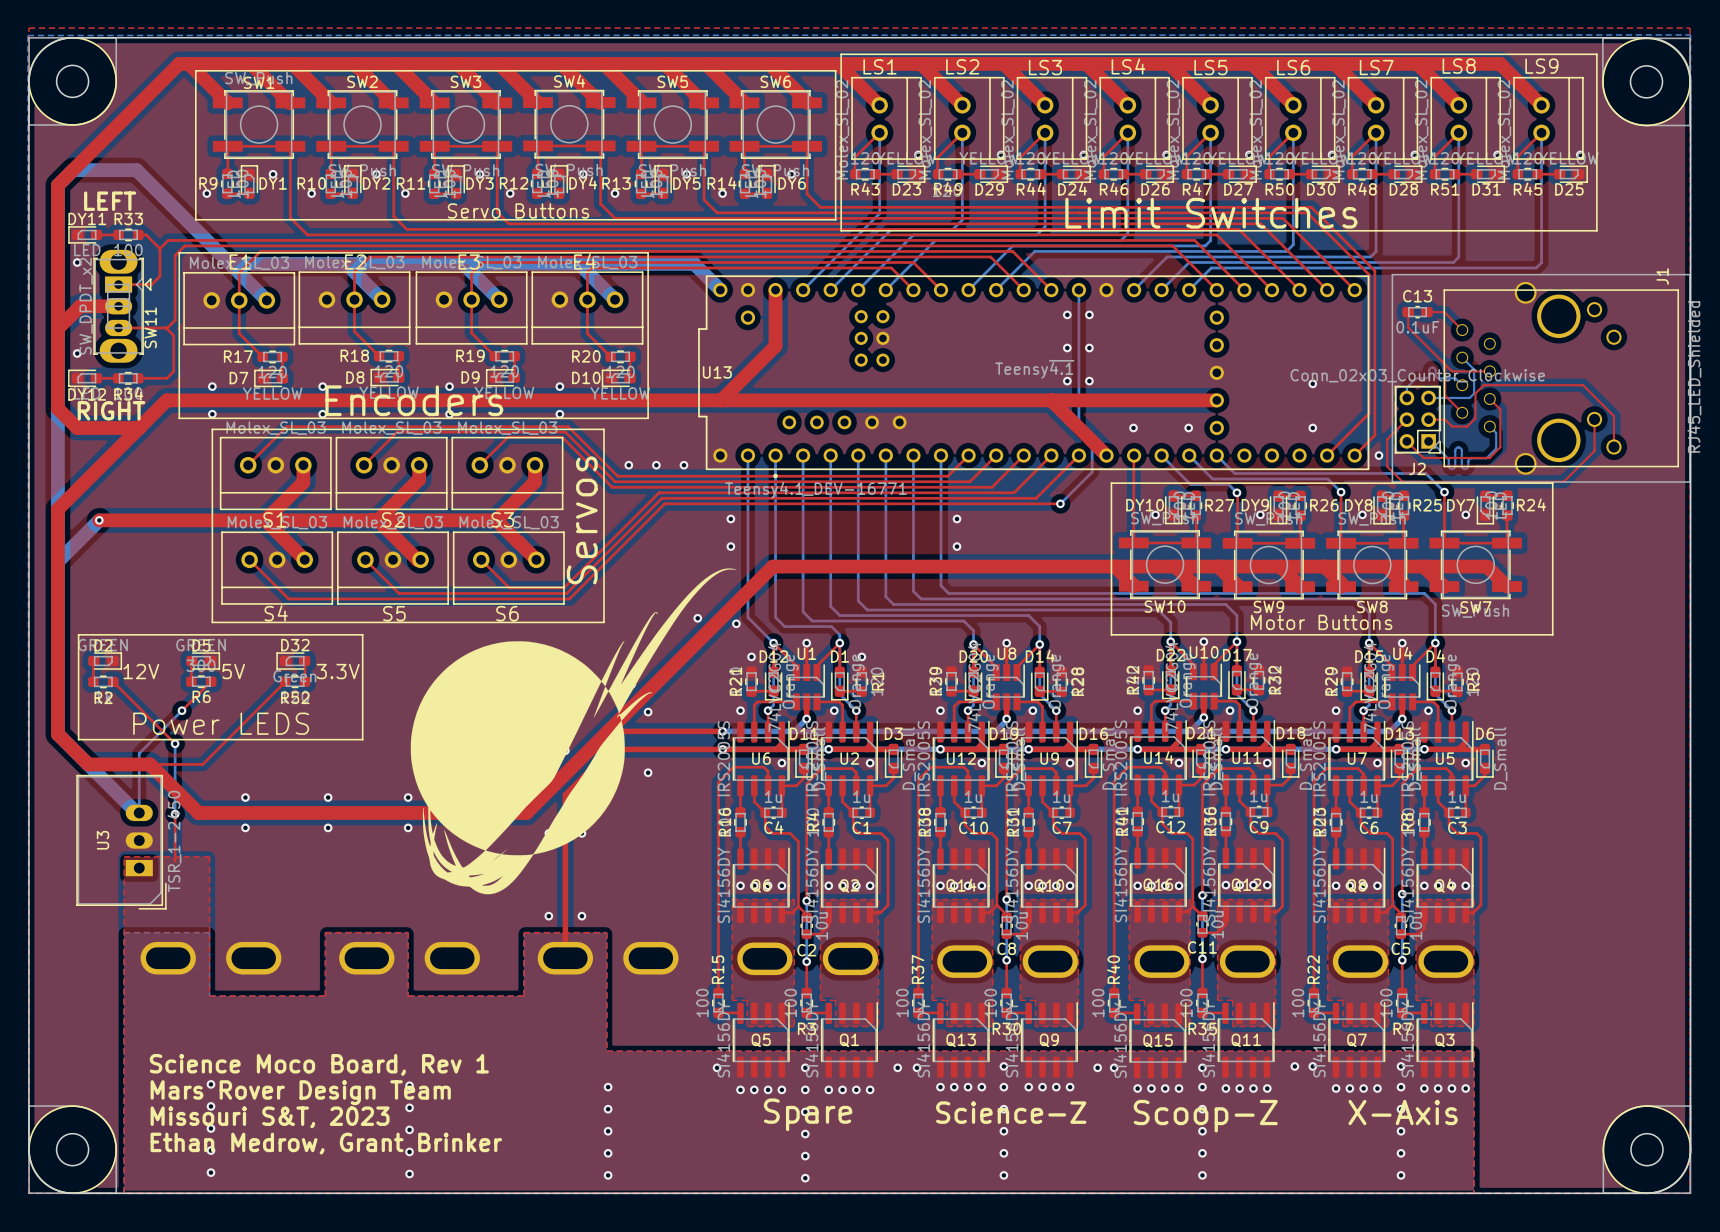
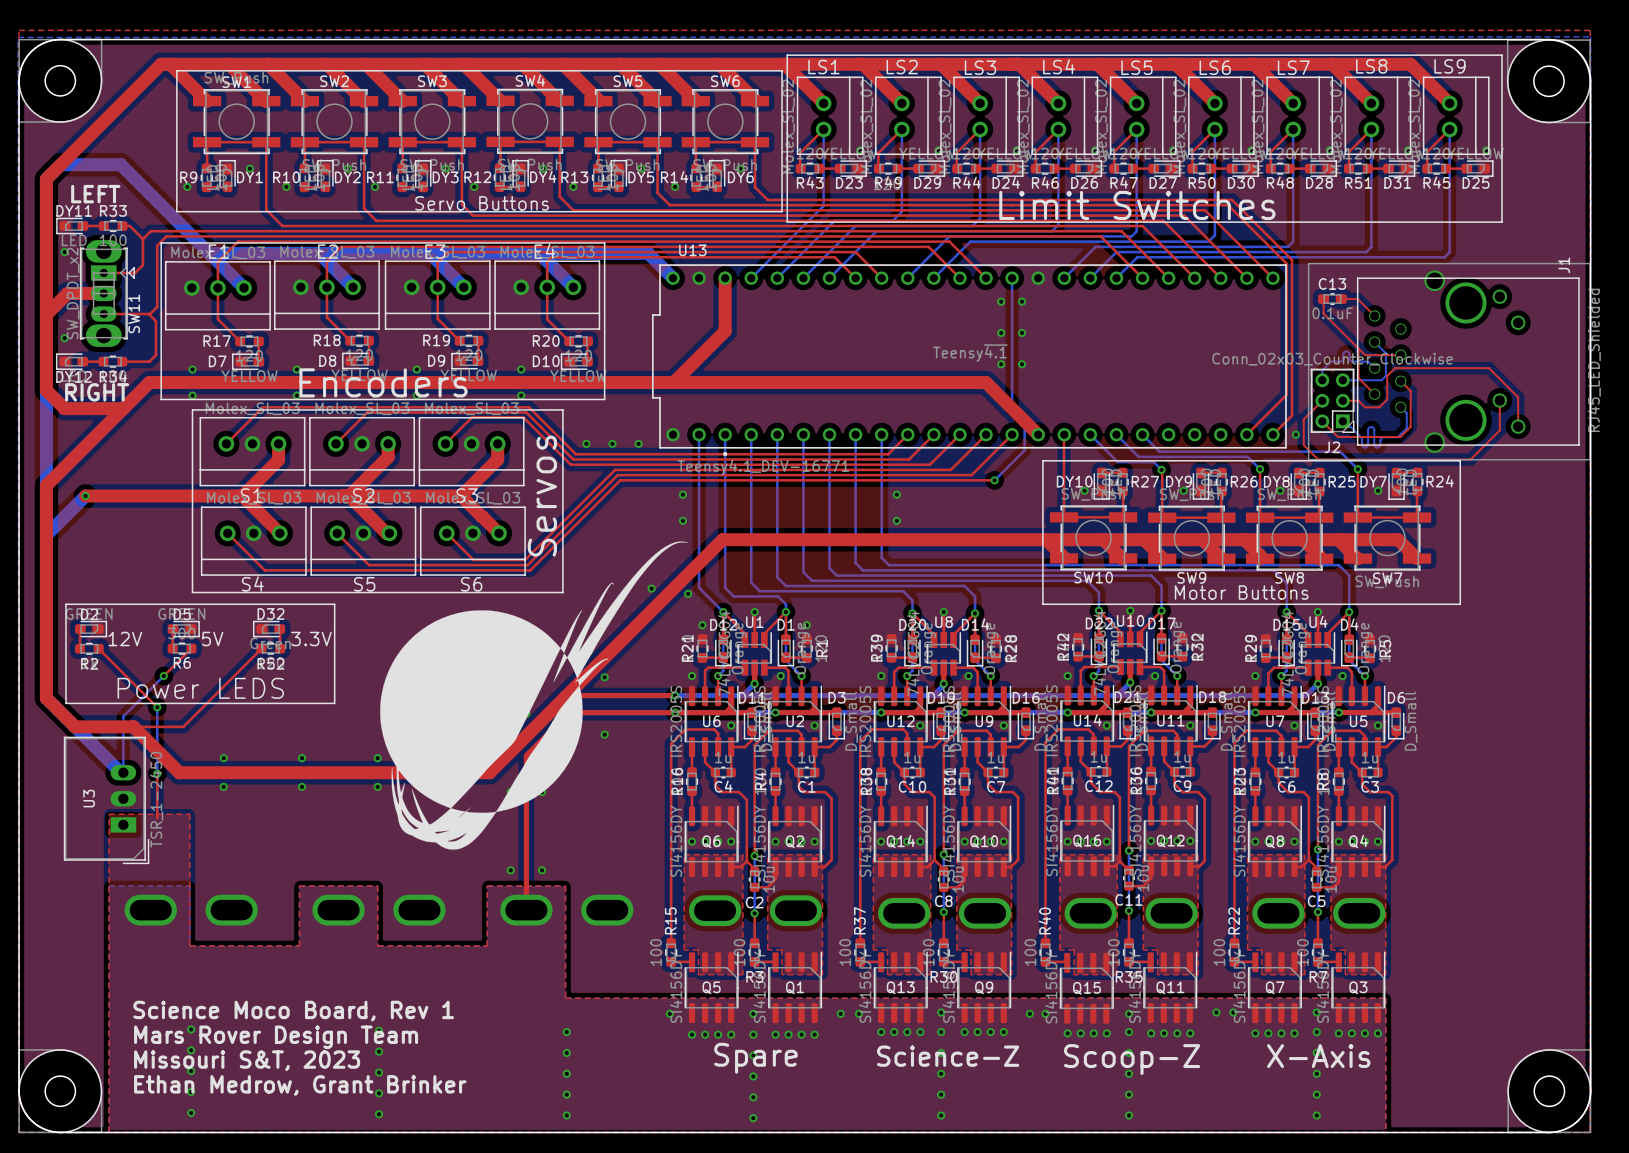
U13 footprint: [698, 275, 1370, 479] -> [652, 264, 1287, 457]
U13 name position: U13 (717, 372) -> U13 (692, 250)
via: (1312, 383) -> none
top track: (1050, 400) (1216, 400) -> none
via: (1133, 427) -> none
via: (1188, 427) -> none
via: (1312, 427) -> none

